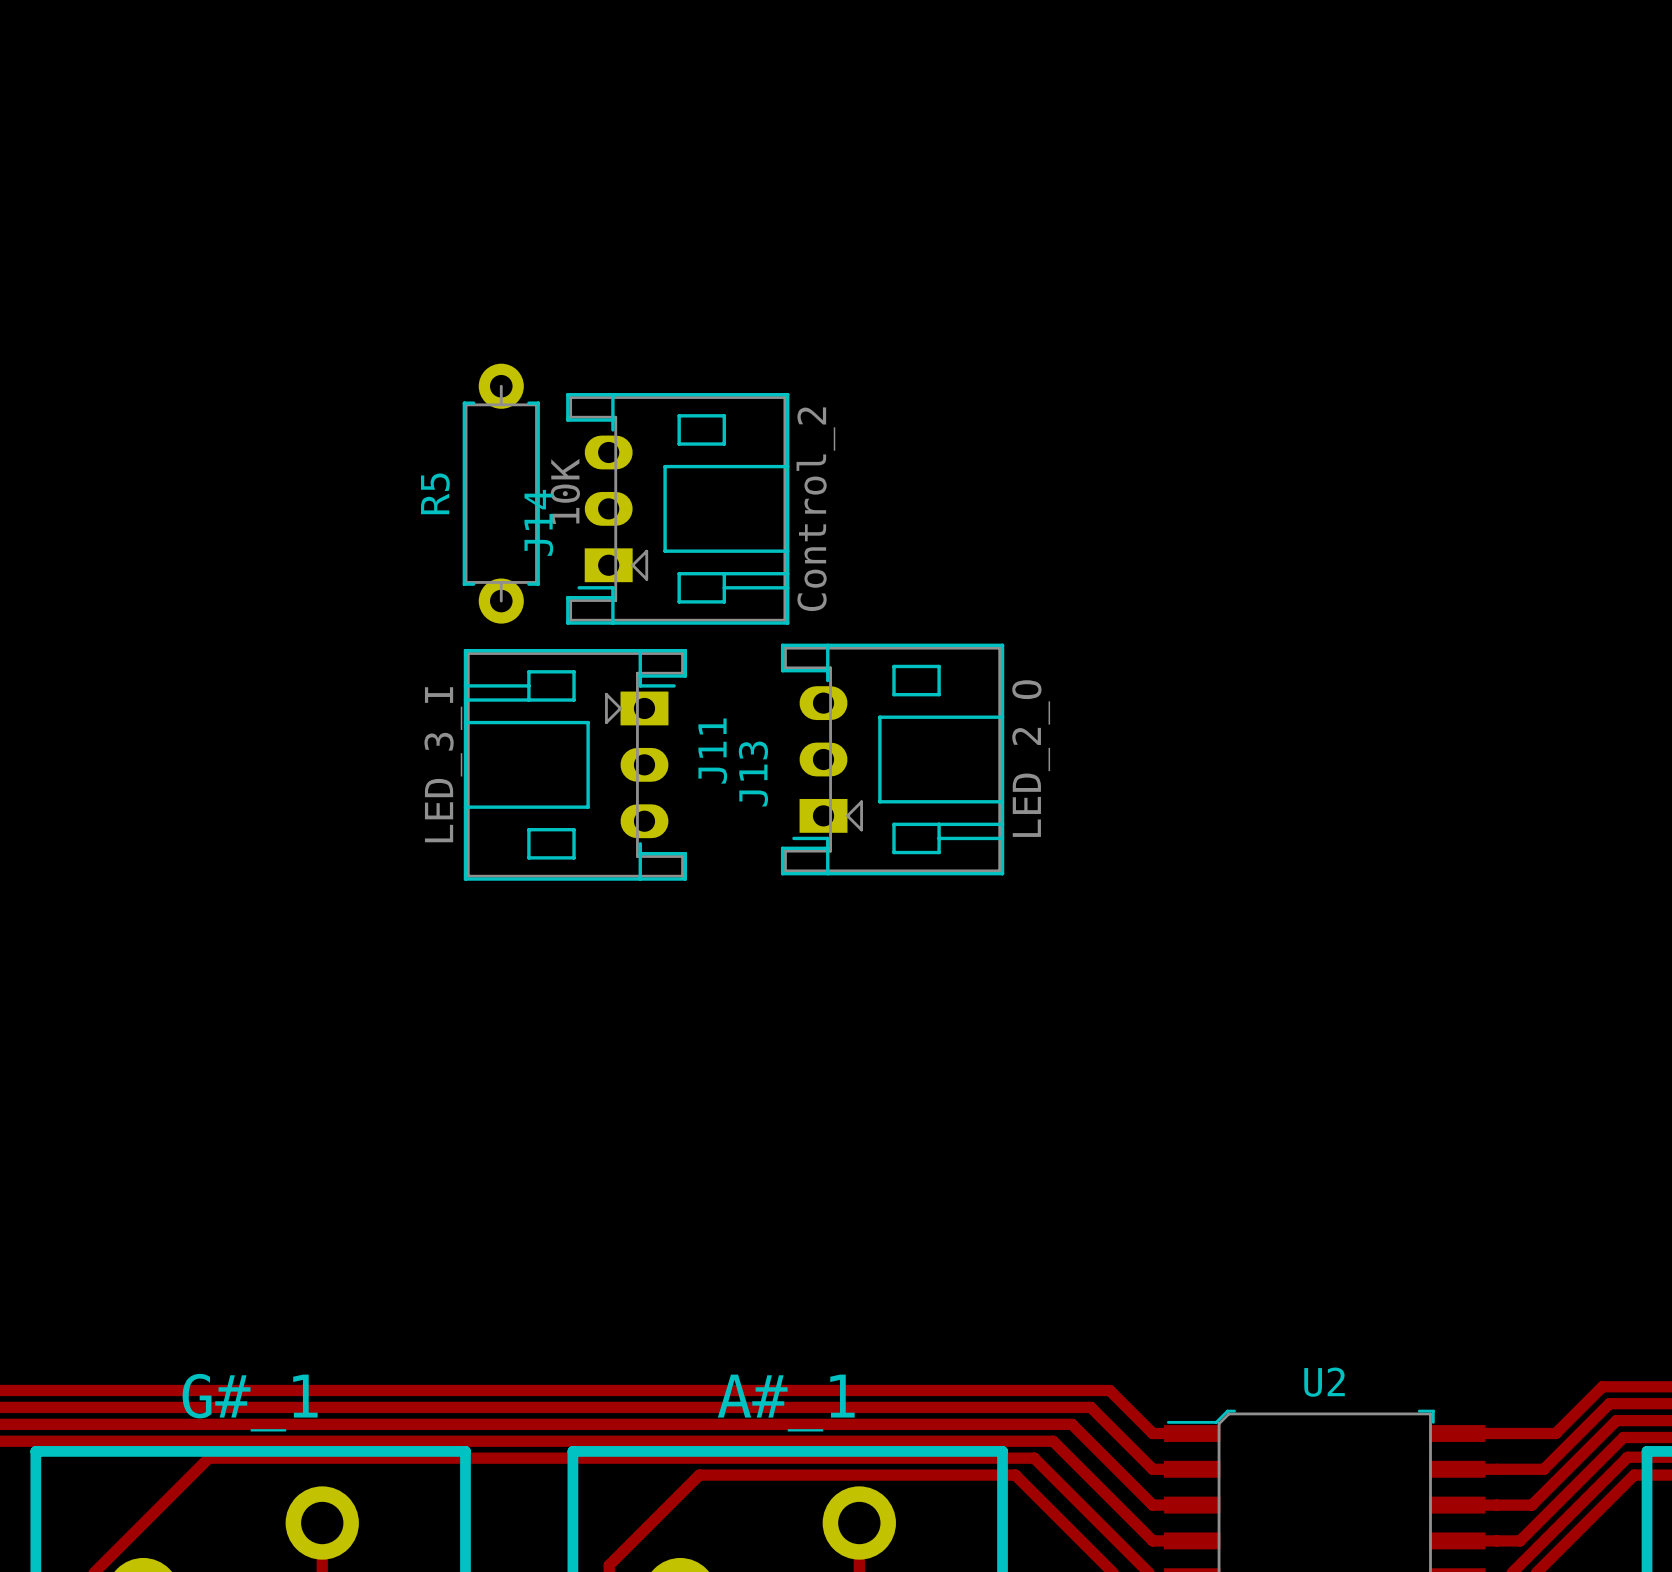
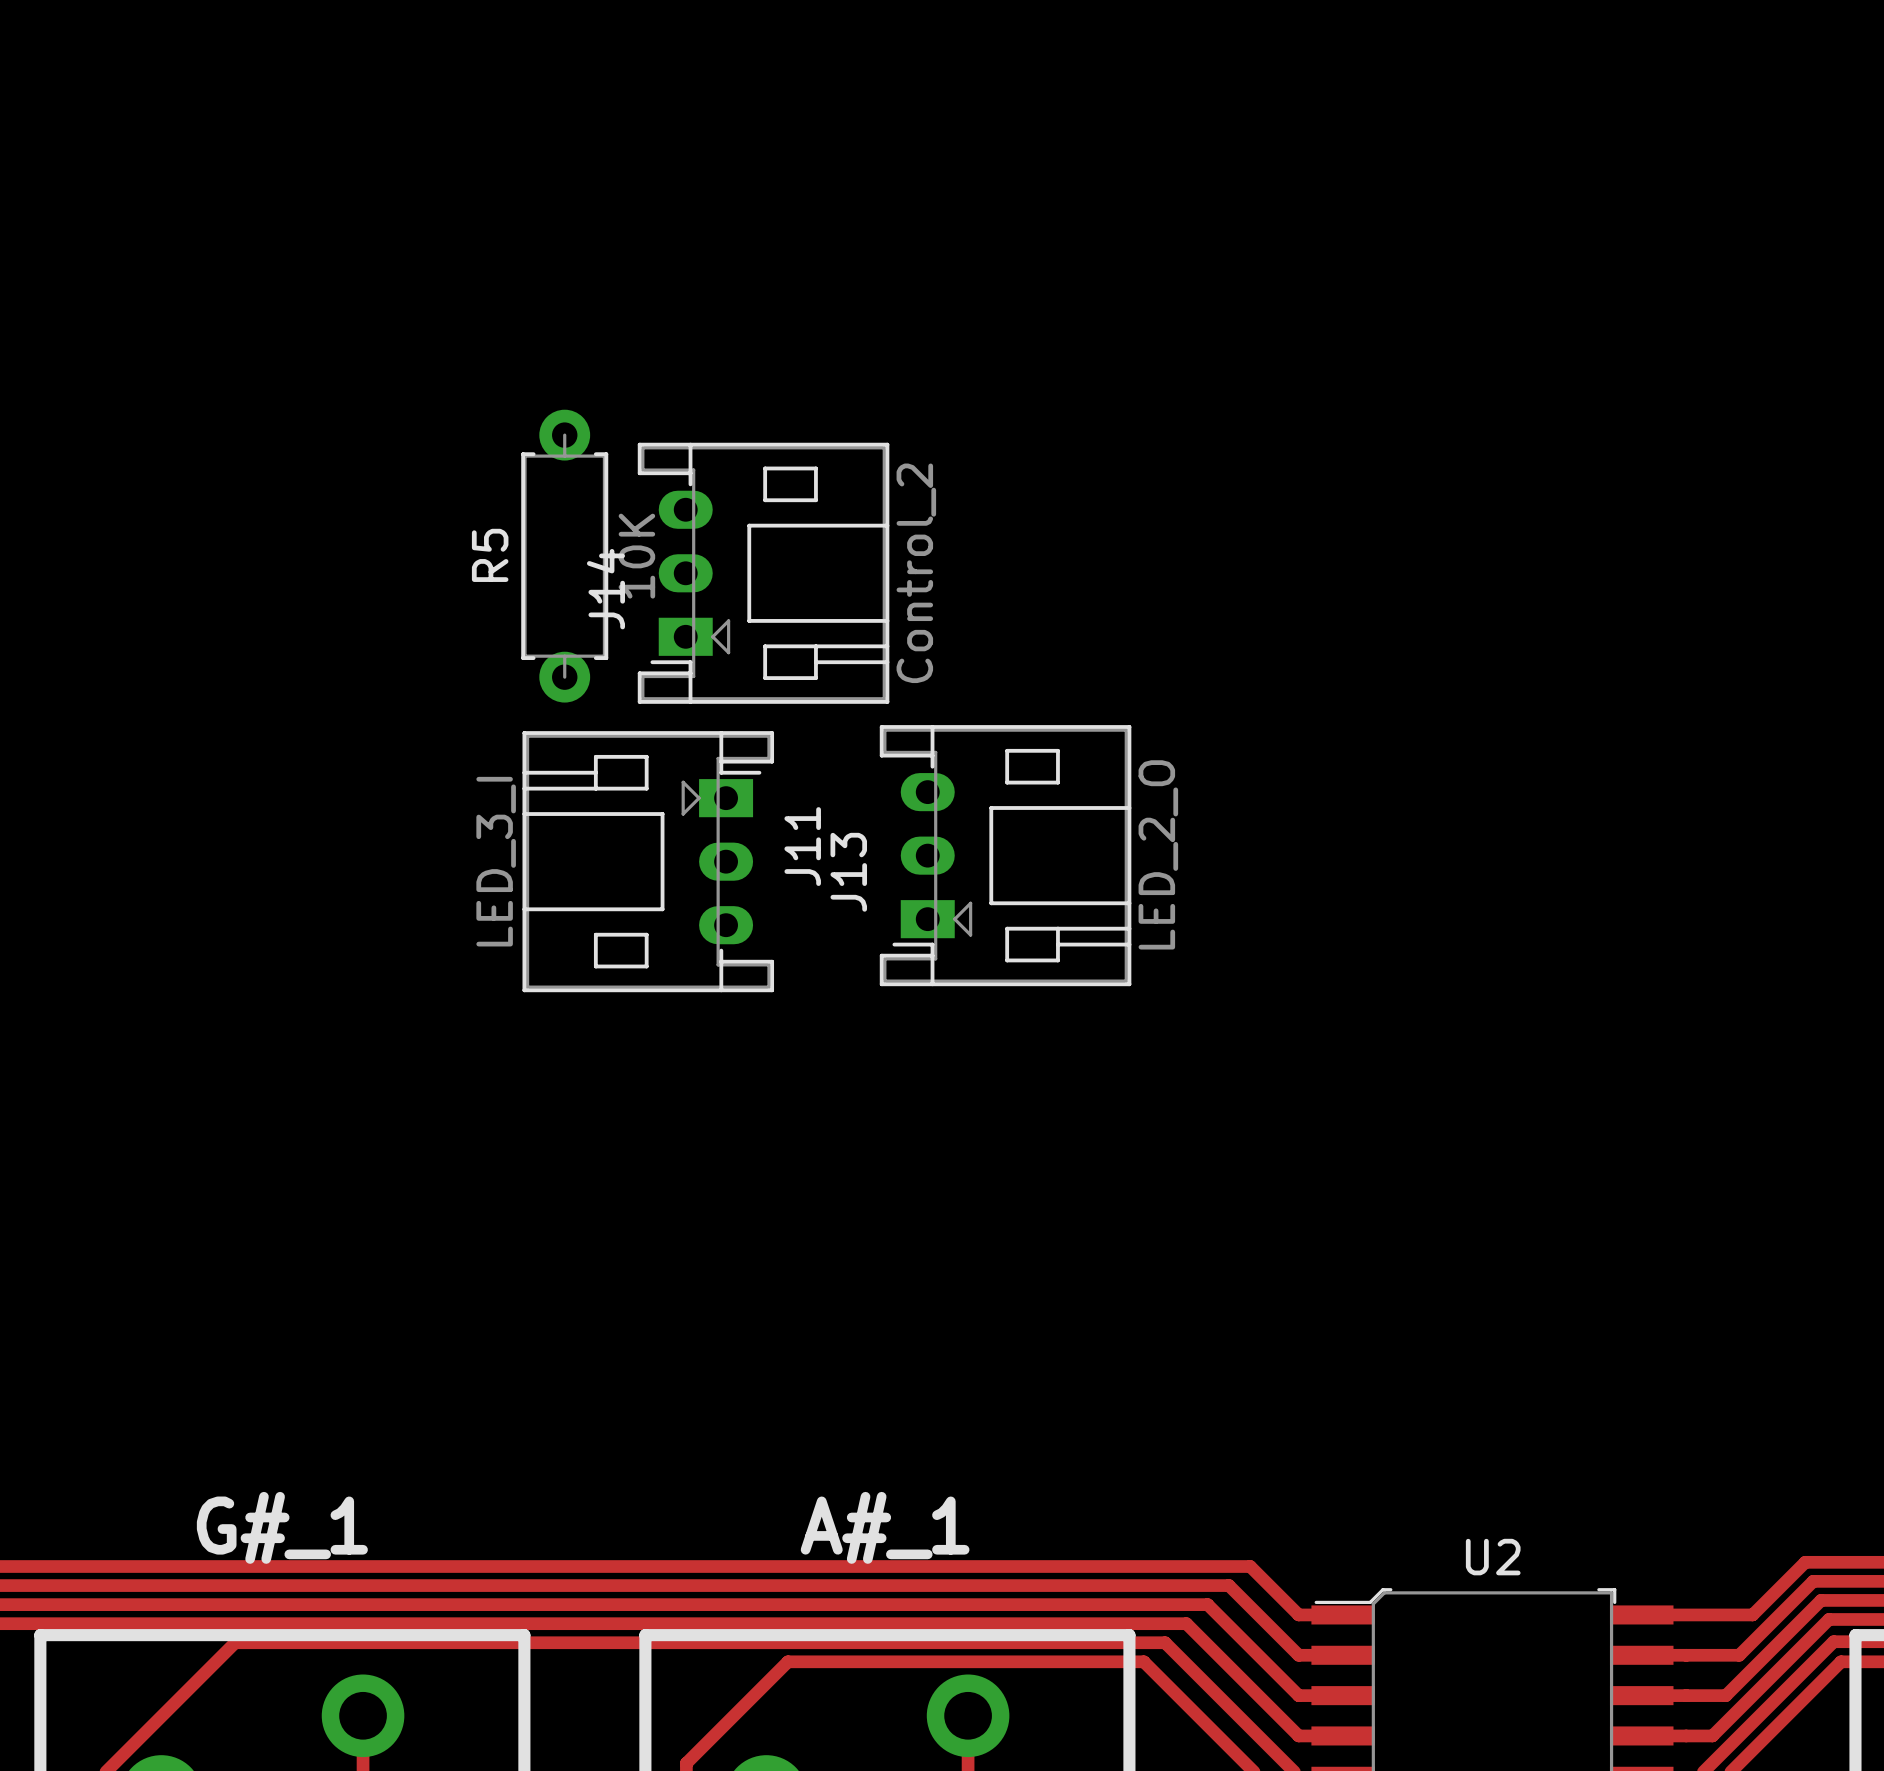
part value position: G#_1 (250, 1402) -> G#_1 (282, 1527)
part value position: A#_1 (786, 1403) -> A#_1 (885, 1527)

